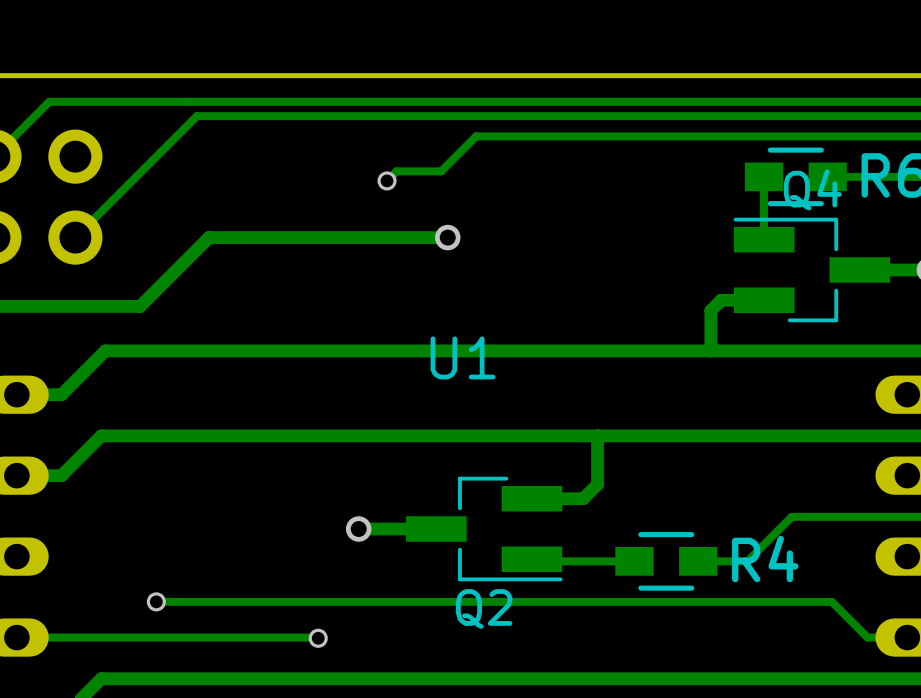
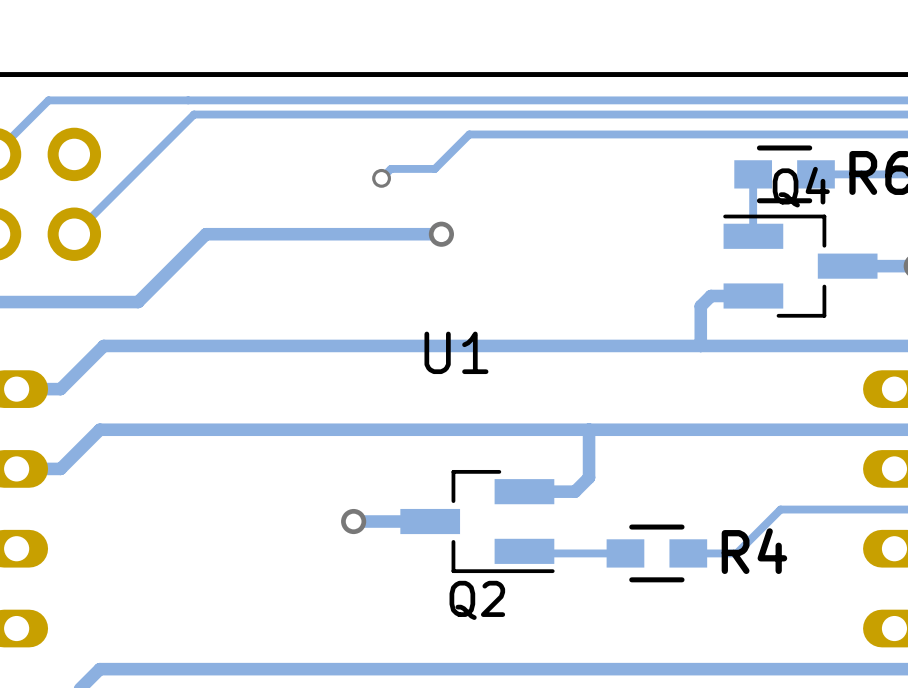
track: (156, 601) (831, 601) (867, 637) (907, 637) -> none
via: (156, 601) -> none
track: (16, 637) (318, 638) -> none
via: (318, 638) -> none

